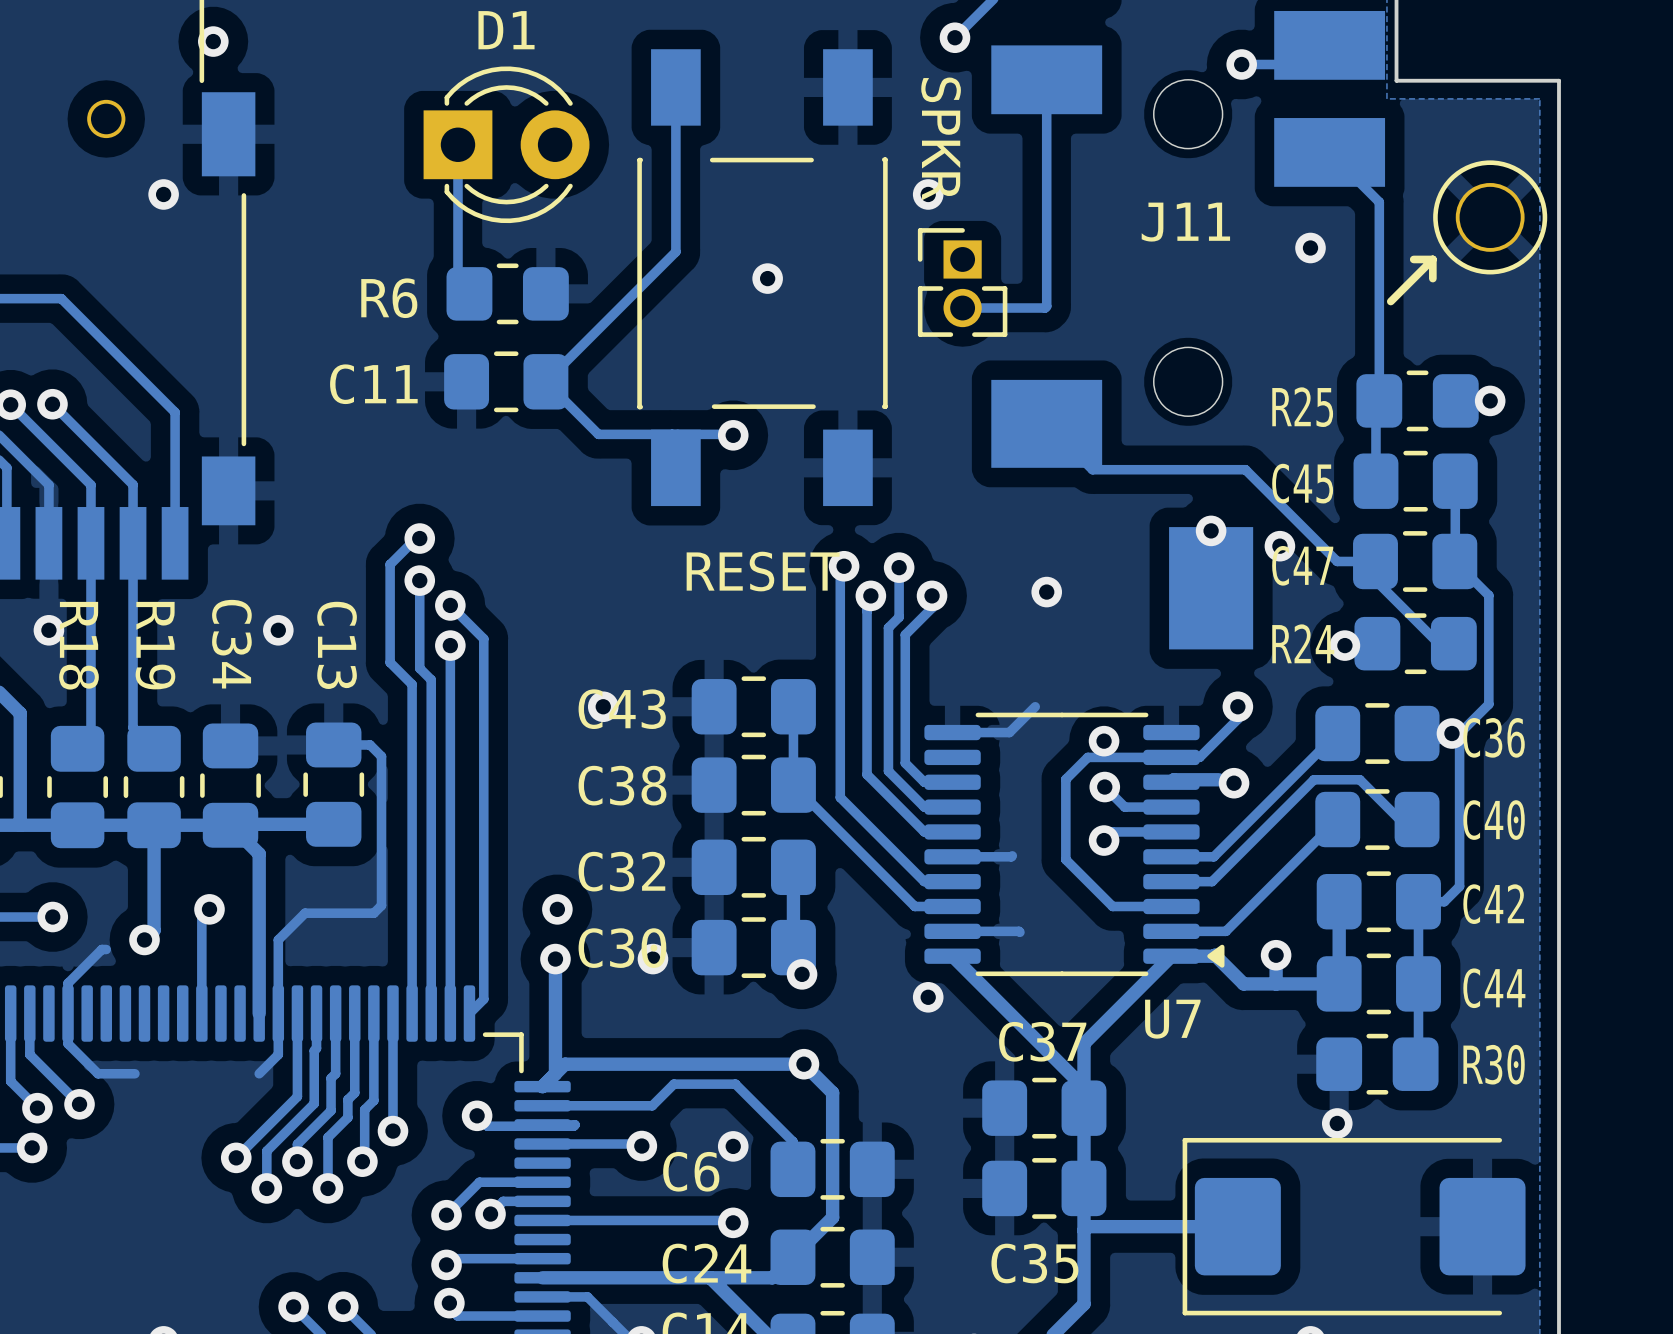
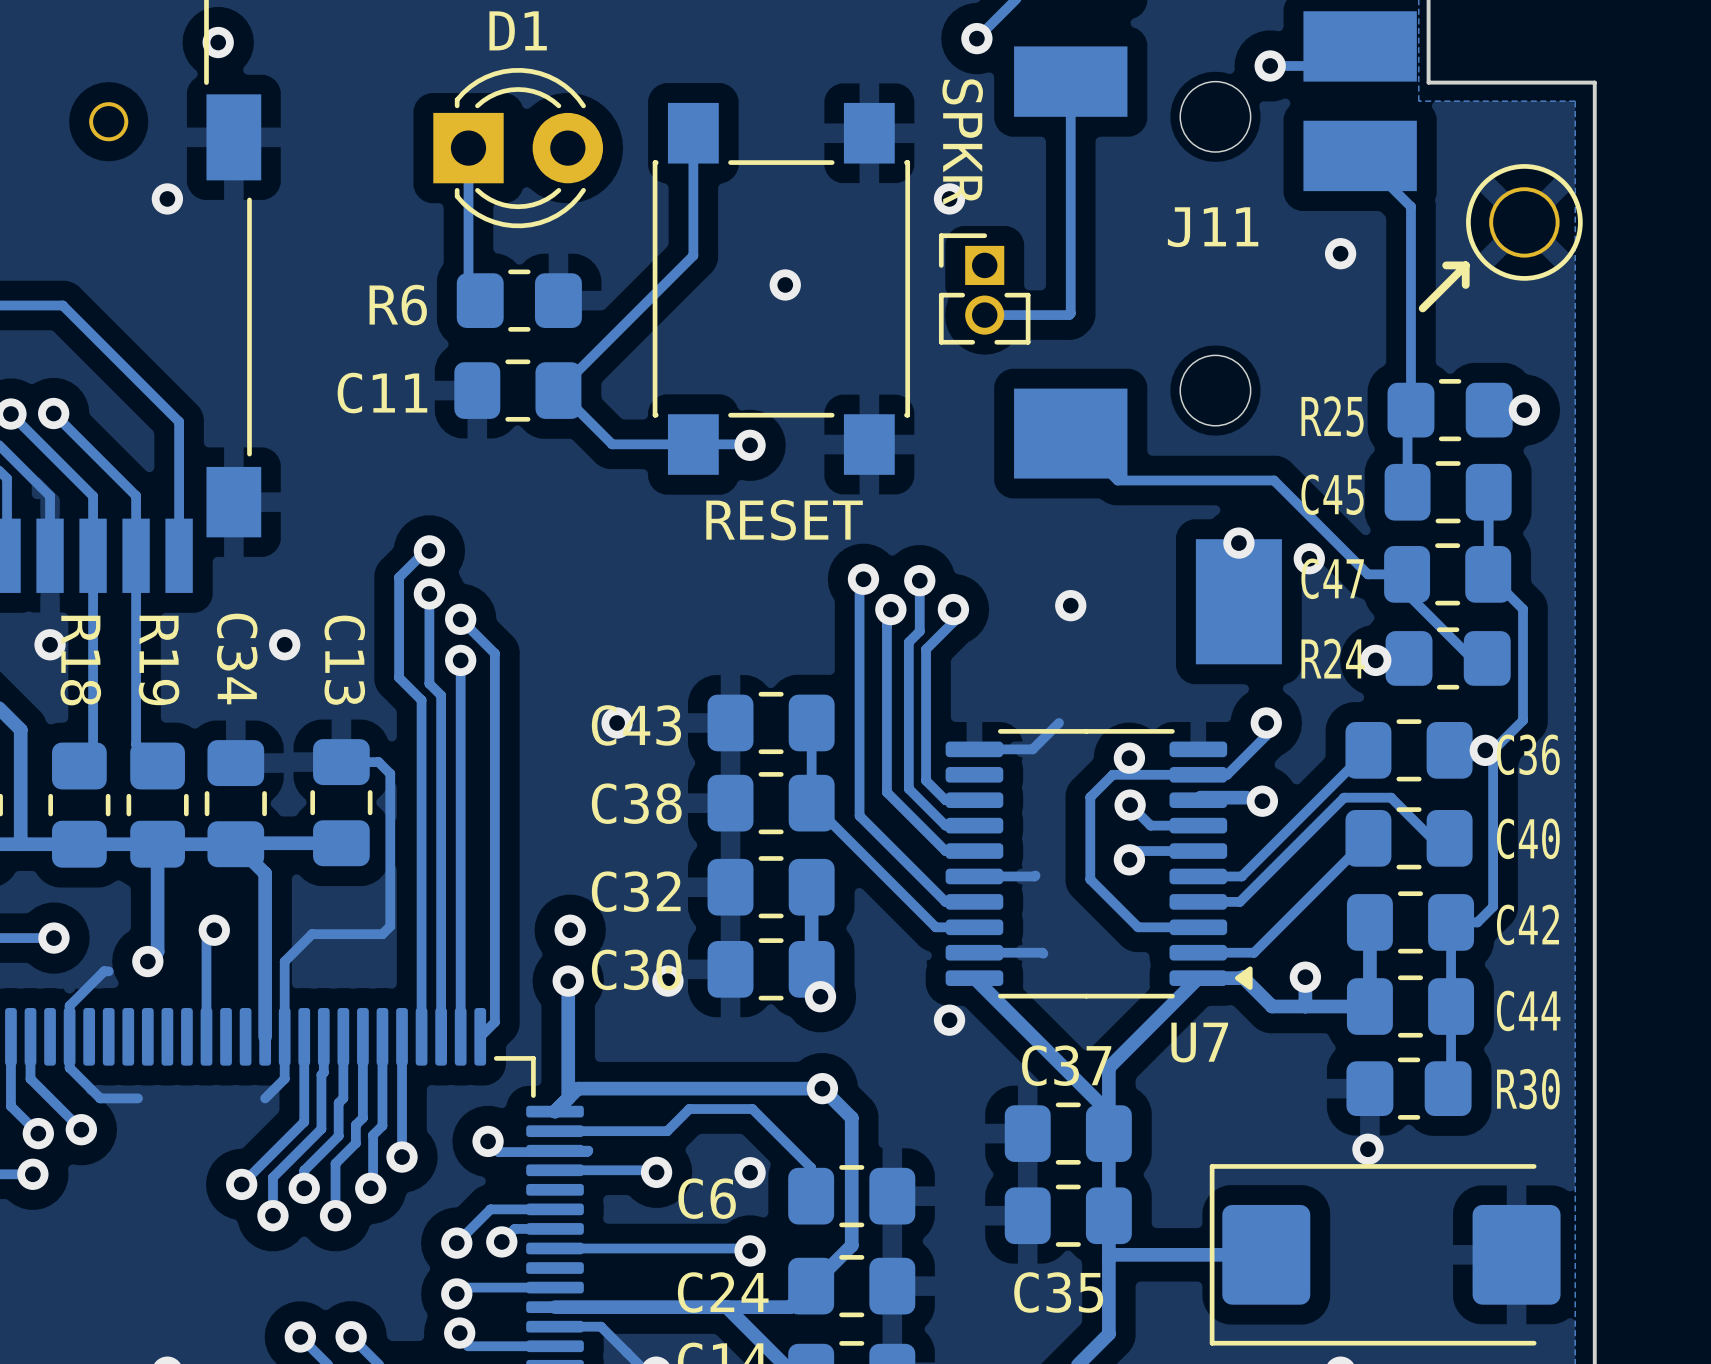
part footprint: [637, 49, 888, 507] -> [652, 102, 911, 475]
track: (675, 74) (675, 251) -> (693, 133) (693, 255) (691, 257)

